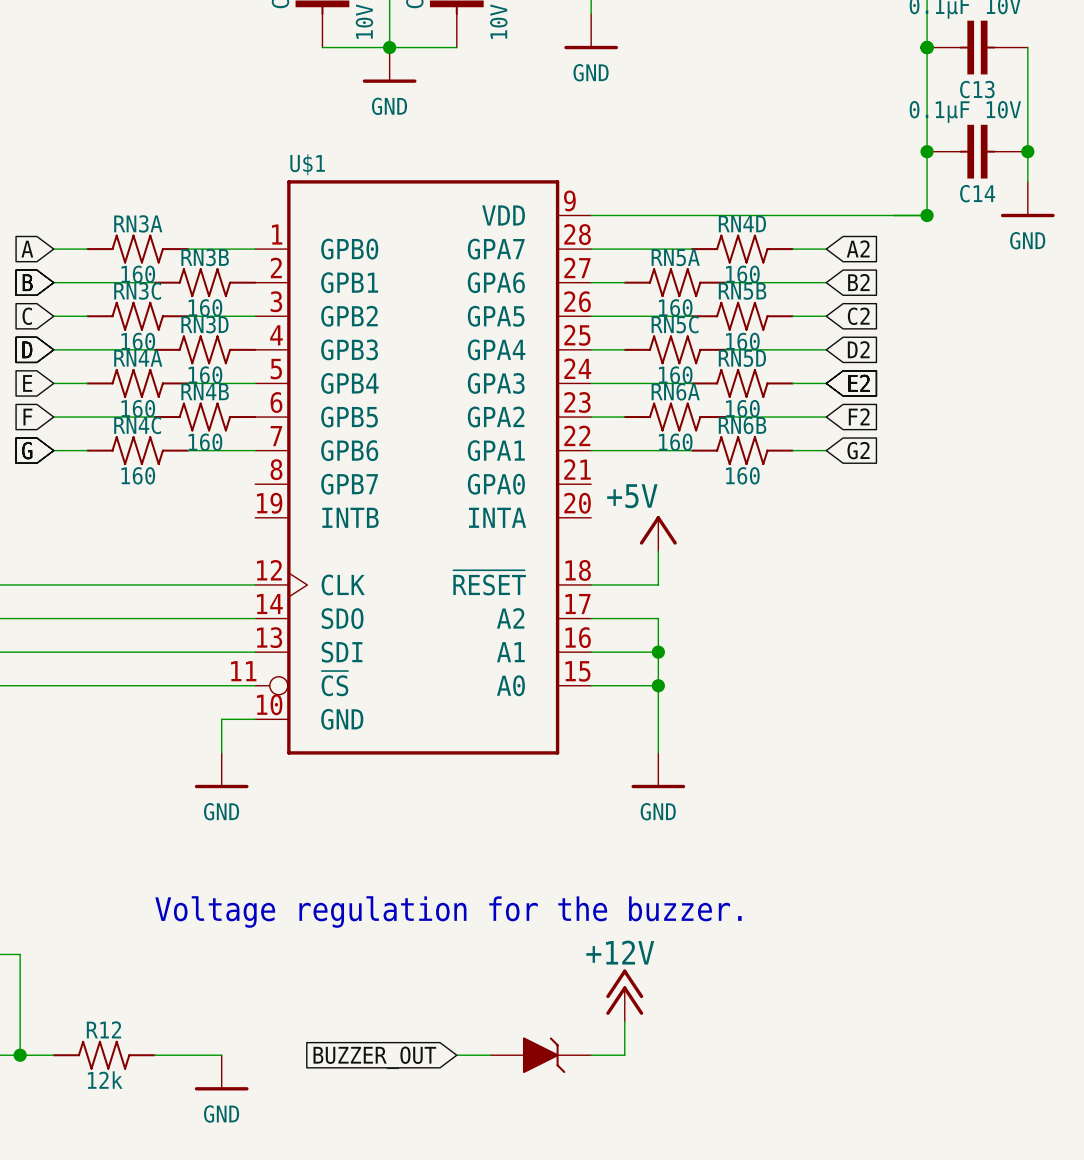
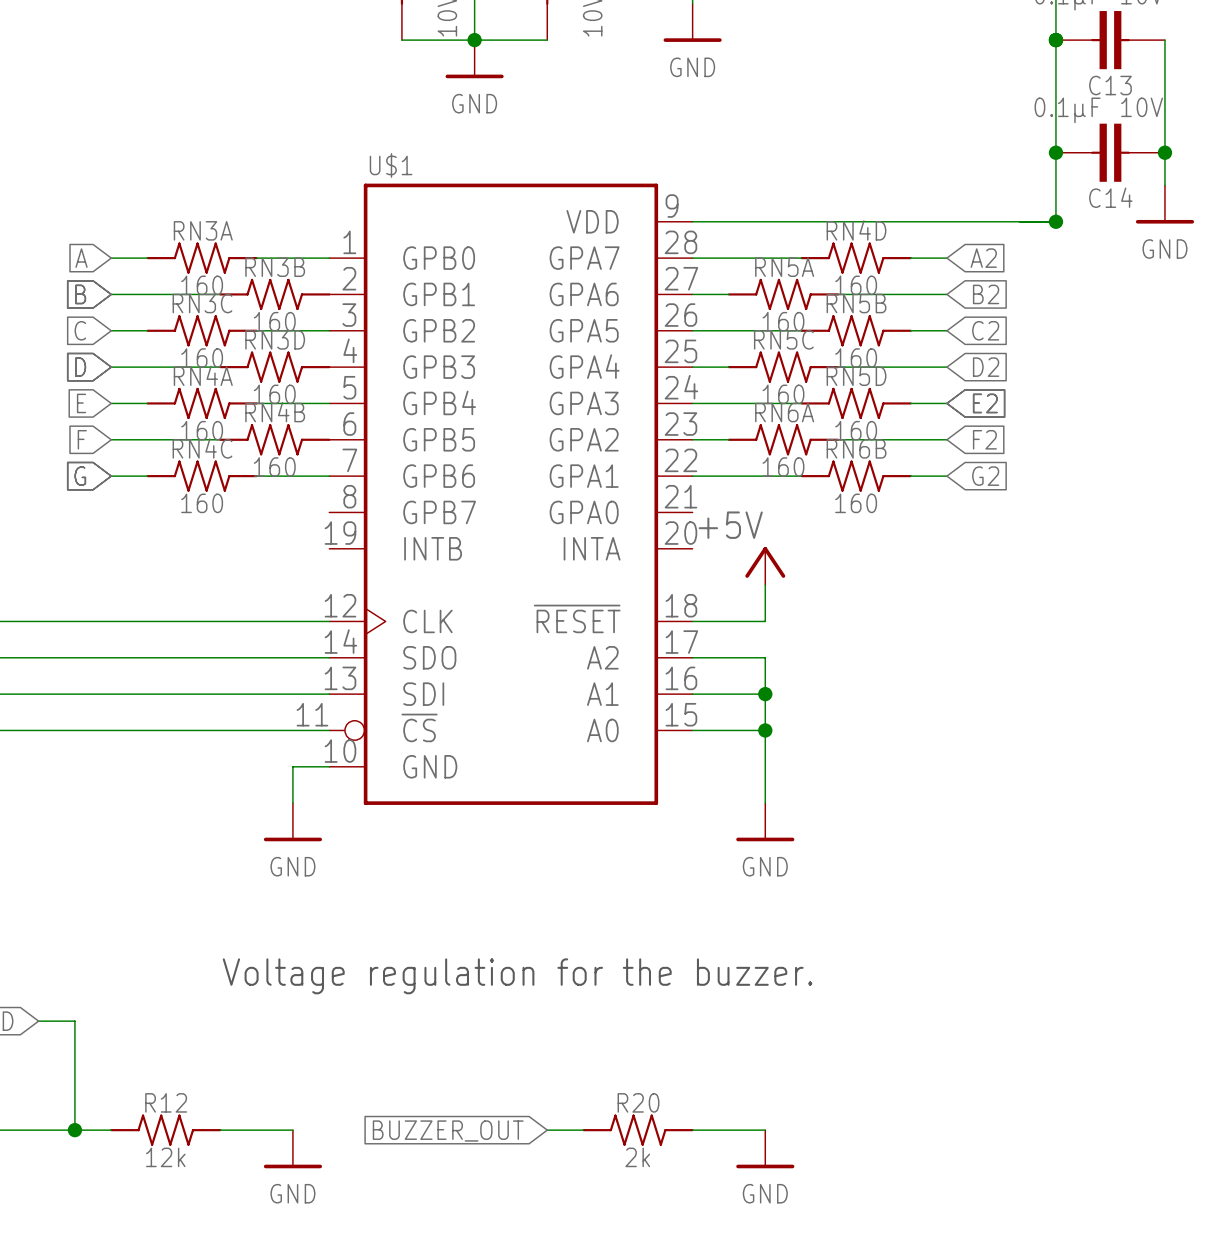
power symbol: +12V (624, 995) -> none
wire: (624, 1021) (624, 1055) -> (765, 1130) (728, 1130)
part: (540, 1055) -> none
R20: none -> (638, 1130)
power symbol: none -> GND (765, 1149)

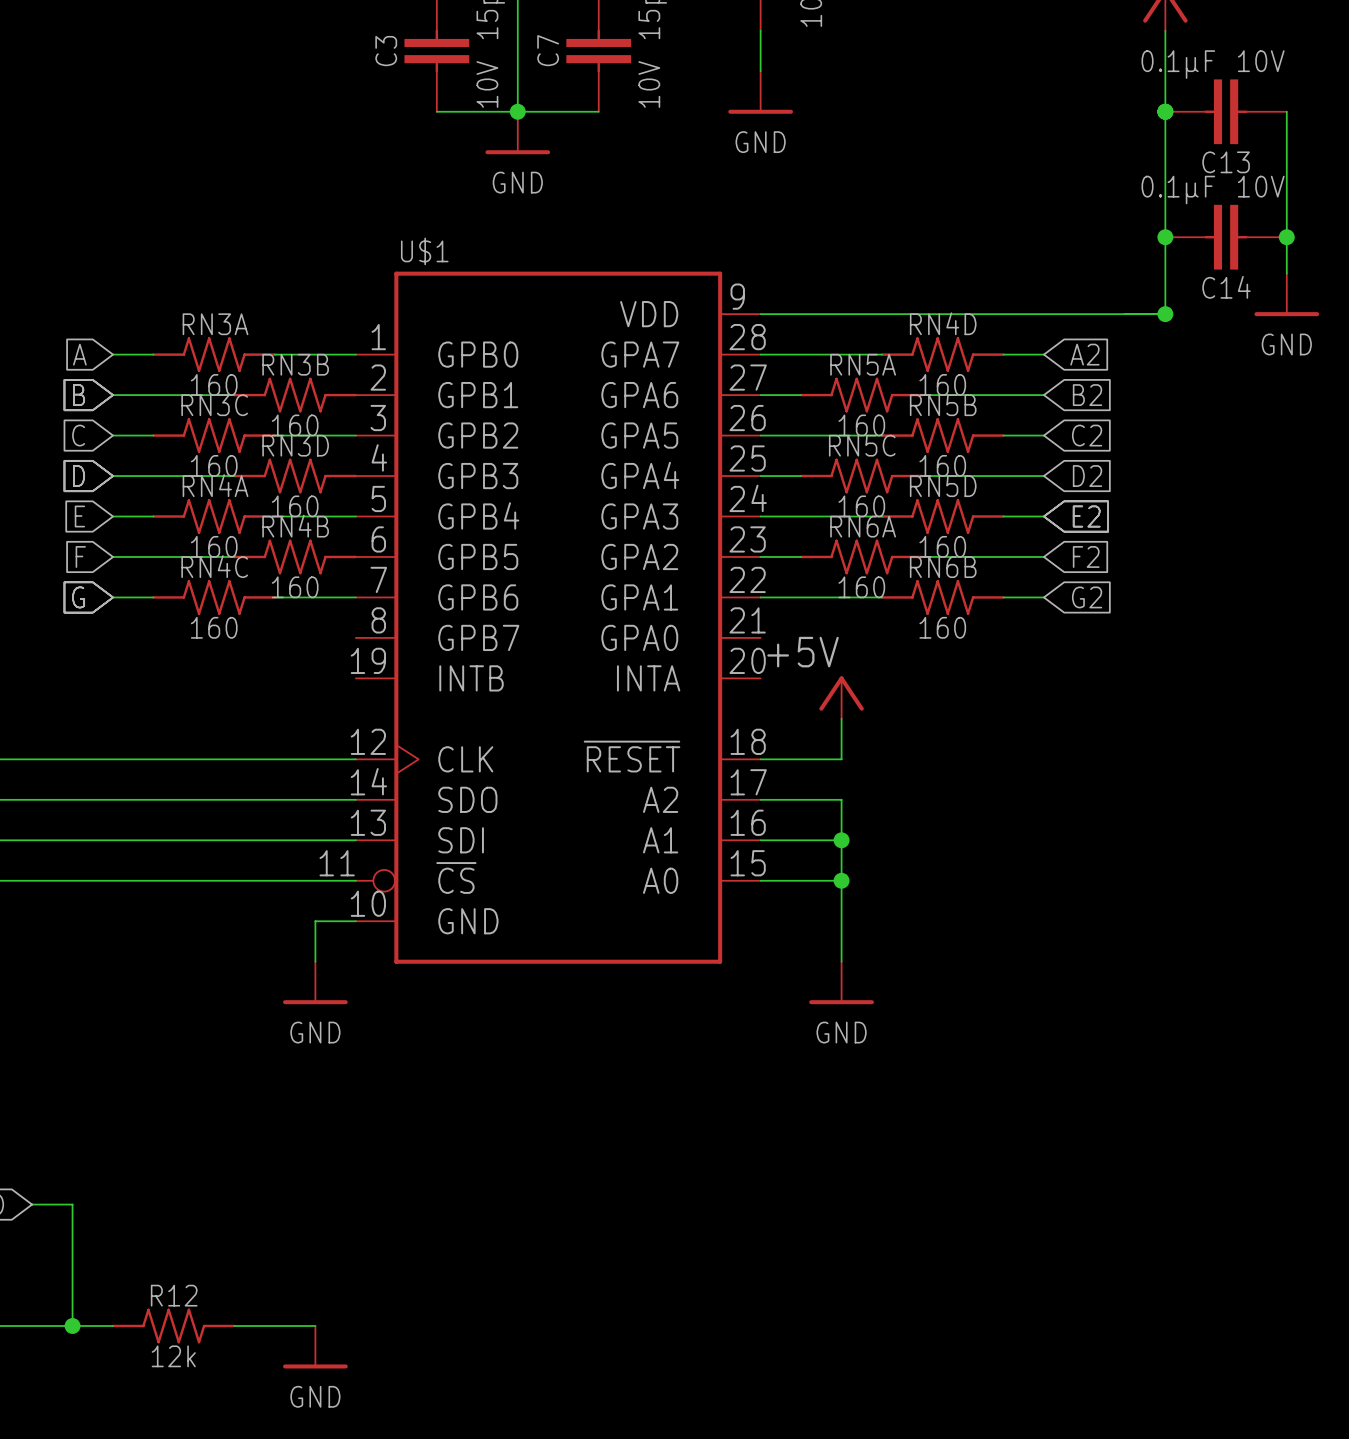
text: Voltage regulation for the buzzer. (517, 976) -> none
wire: (547, 1130) (583, 1130) -> none
R20: (638, 1130) -> none
wire: (692, 1130) (765, 1130) -> none
global label: BUZZER_OUT (448, 1131) -> none
power symbol: GND (765, 1149) -> none

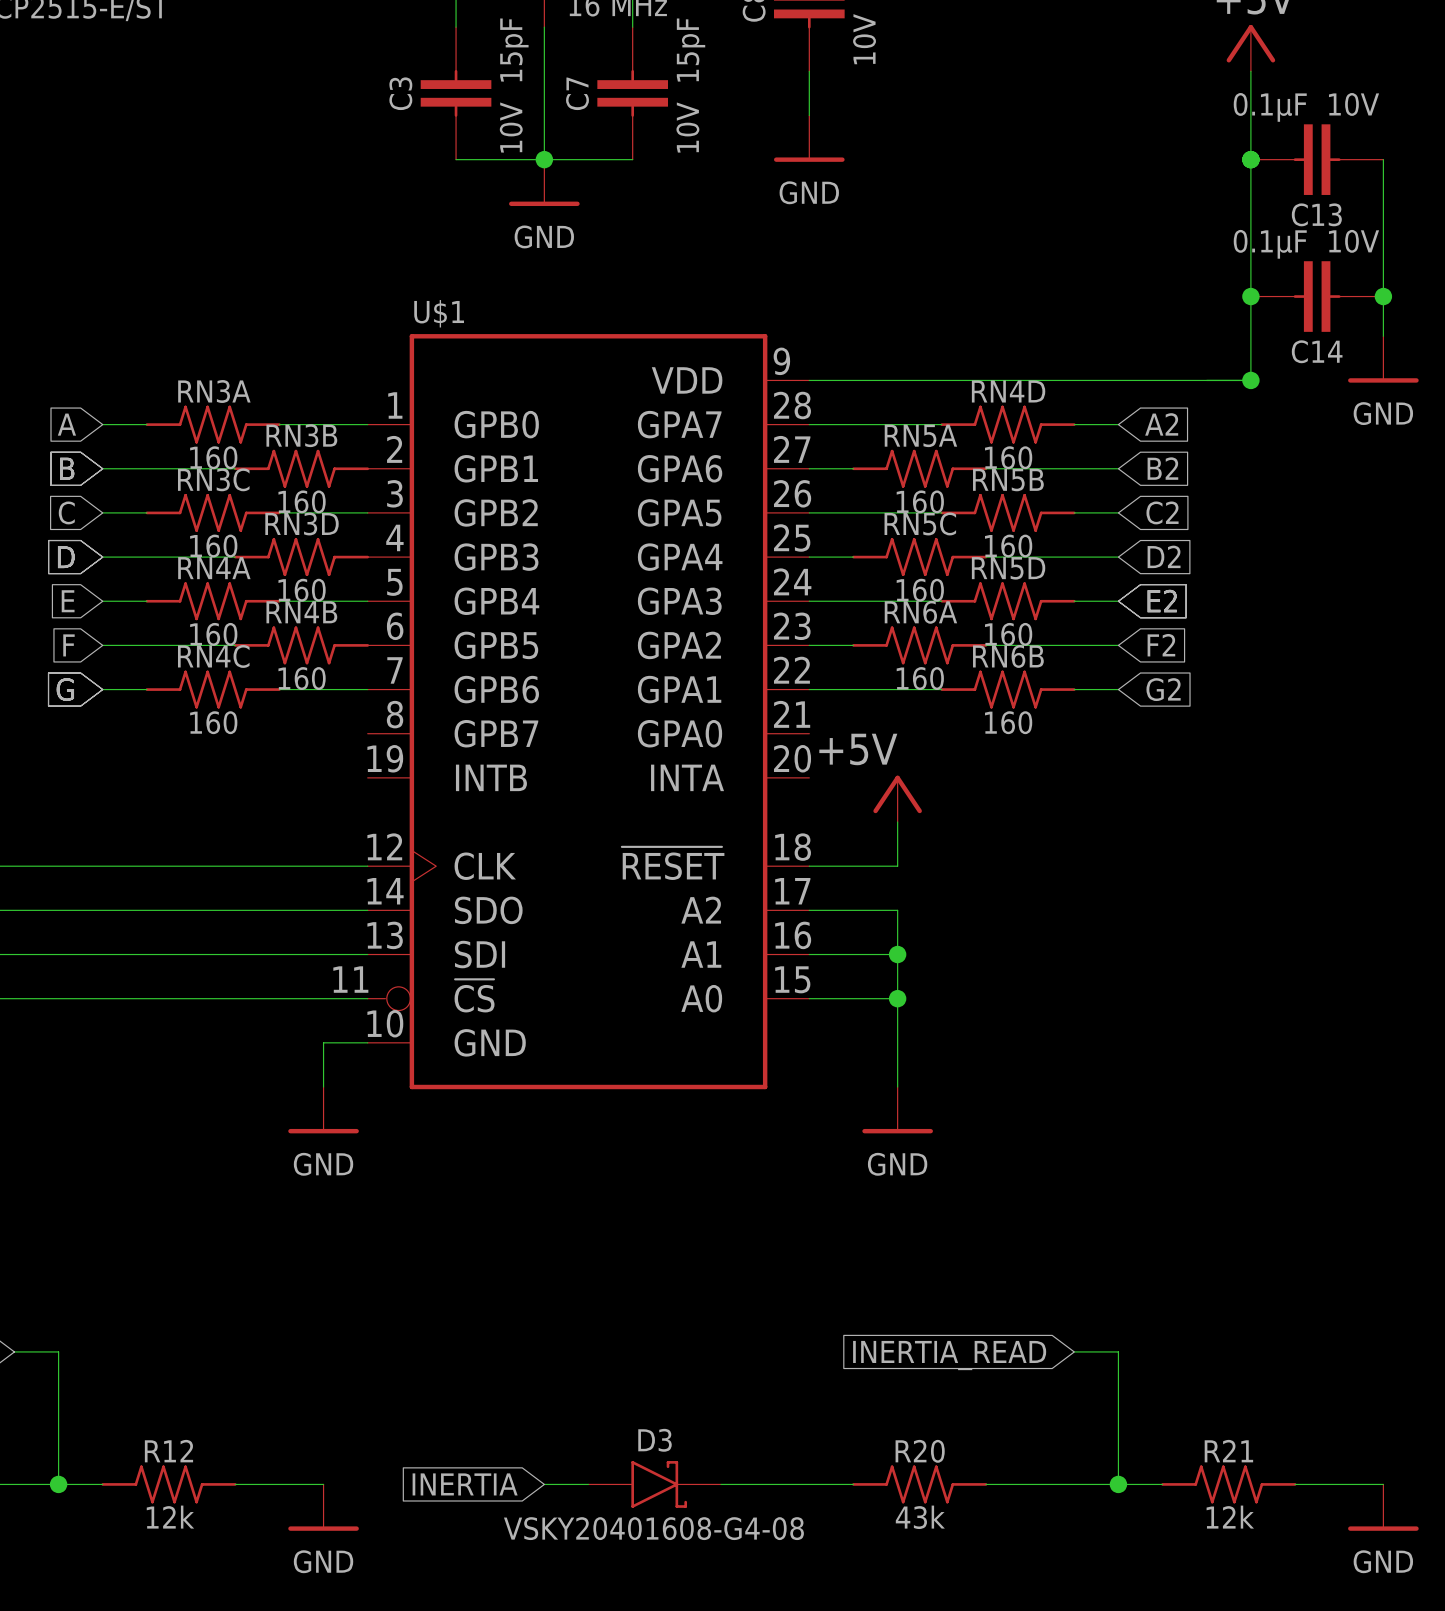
wire: none -> (1074, 1351) (1118, 1351) (1118, 1484)
global label: none -> INERTIA_READ (949, 1355)
global label: none -> INERTIA (465, 1484)
wire: none -> (544, 1484) (588, 1484)
D3: none -> (654, 1484)
wire: none -> (720, 1484) (853, 1484)
R20: none -> (919, 1484)
wire: none -> (985, 1484) (1162, 1484)
junction: none -> (1118, 1484)
R21: none -> (1228, 1484)
wire: none -> (1295, 1484) (1383, 1484)
power symbol: none -> GND (1383, 1507)

